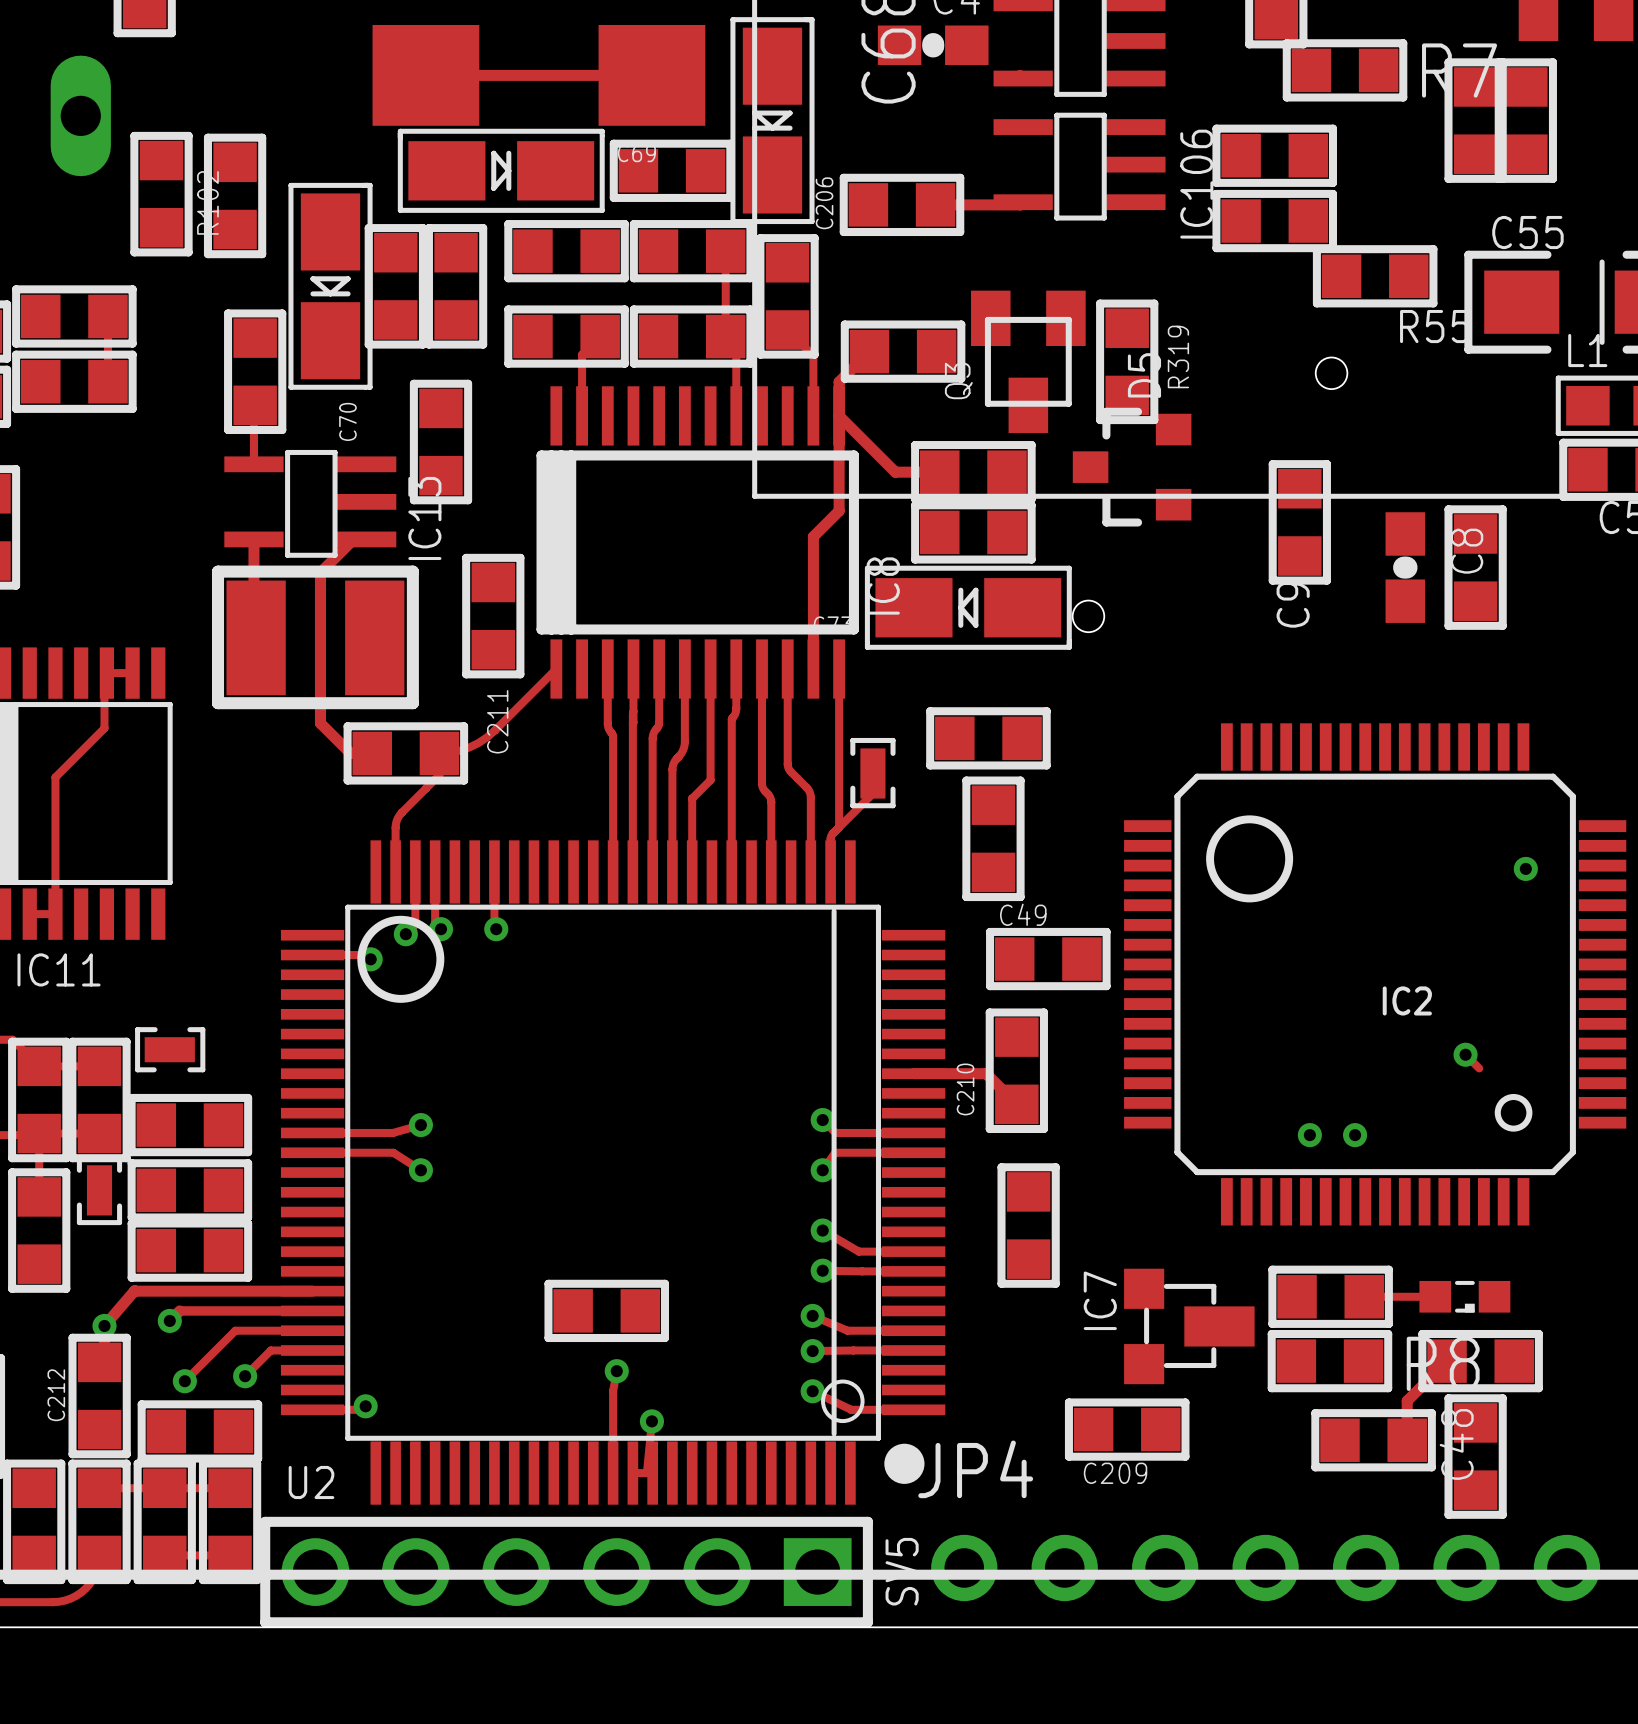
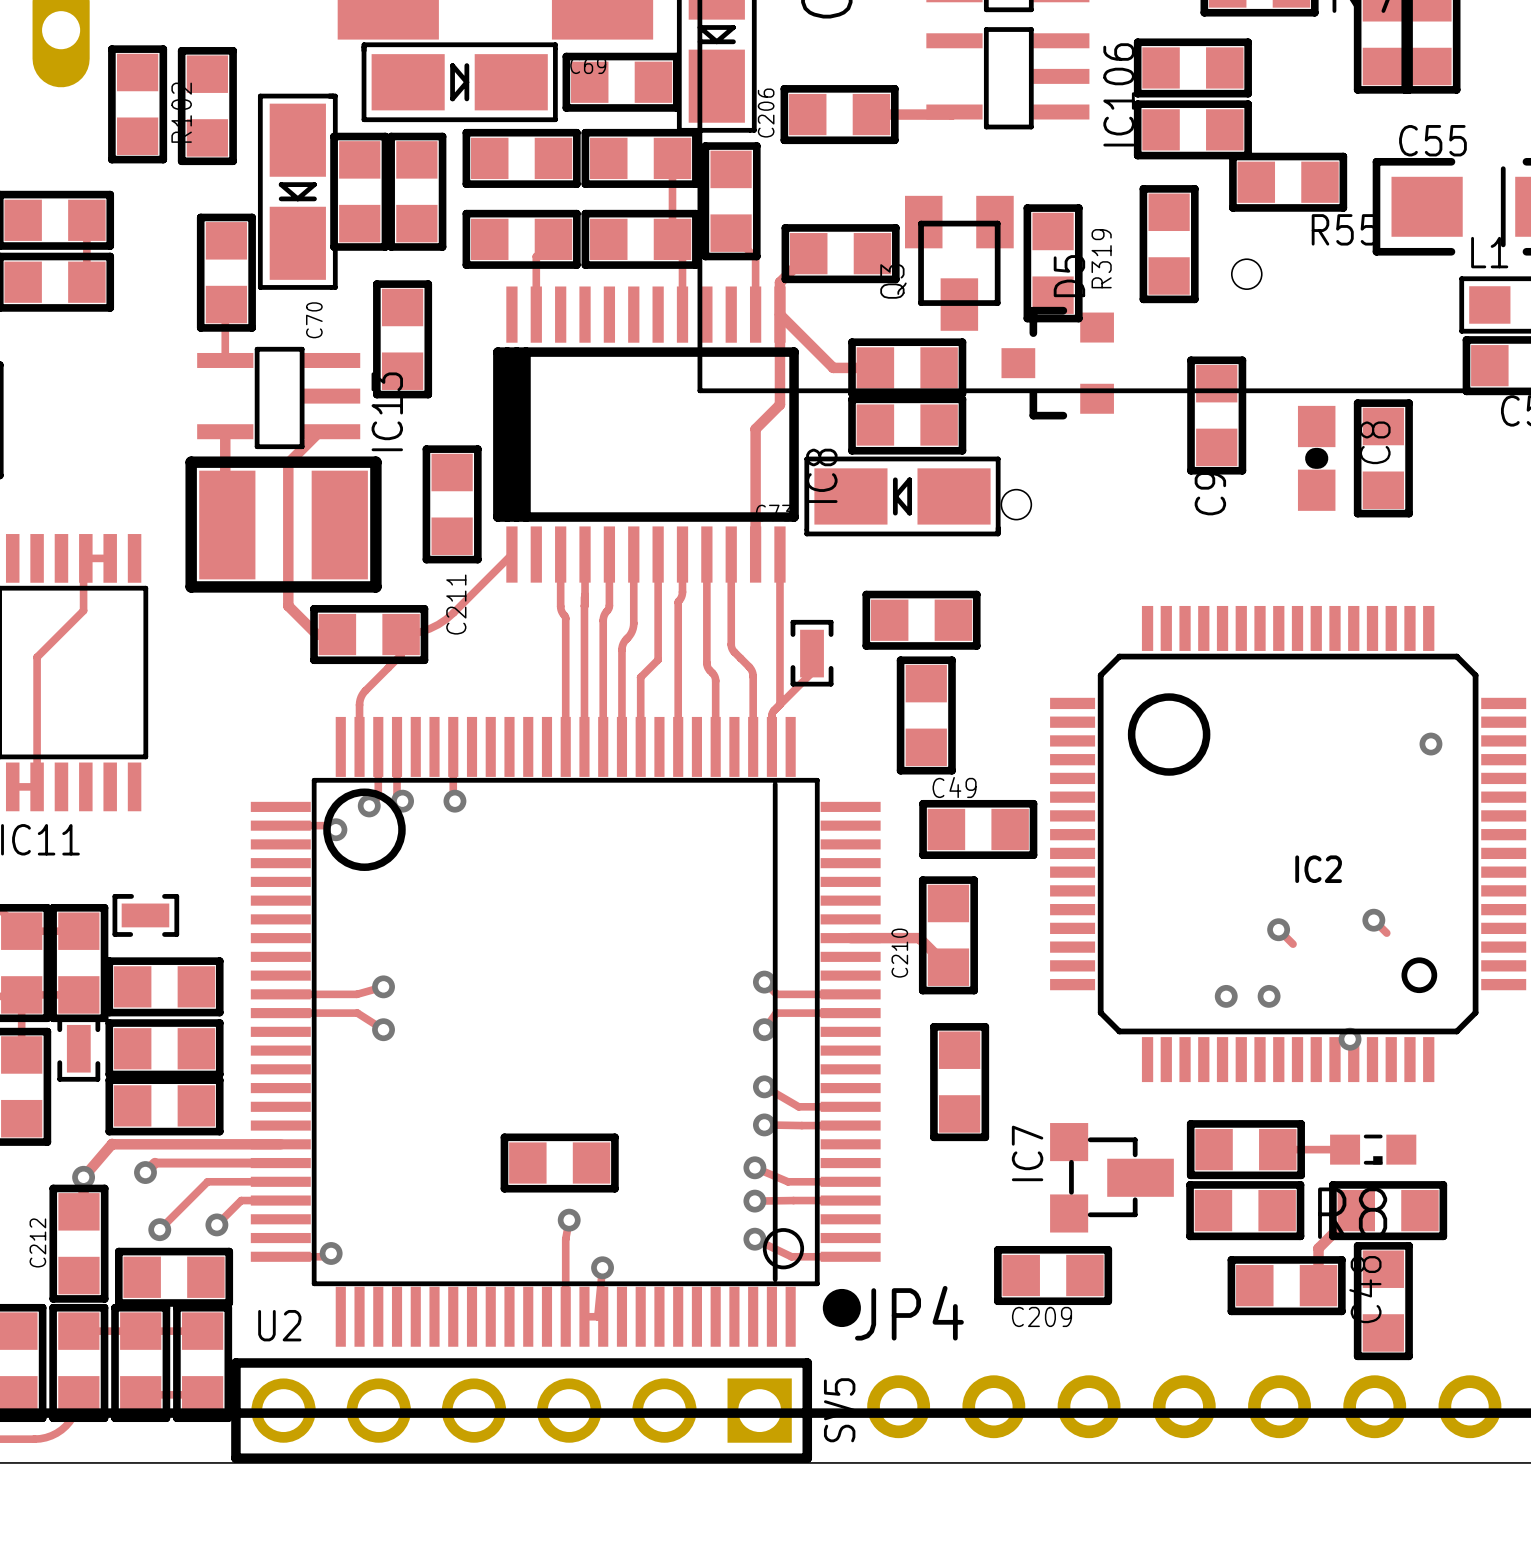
part: none -> (1169, 244)
track: none -> (1278, 929) (1293, 944)
via: none -> (1278, 929)
via: none -> (1350, 1039)

